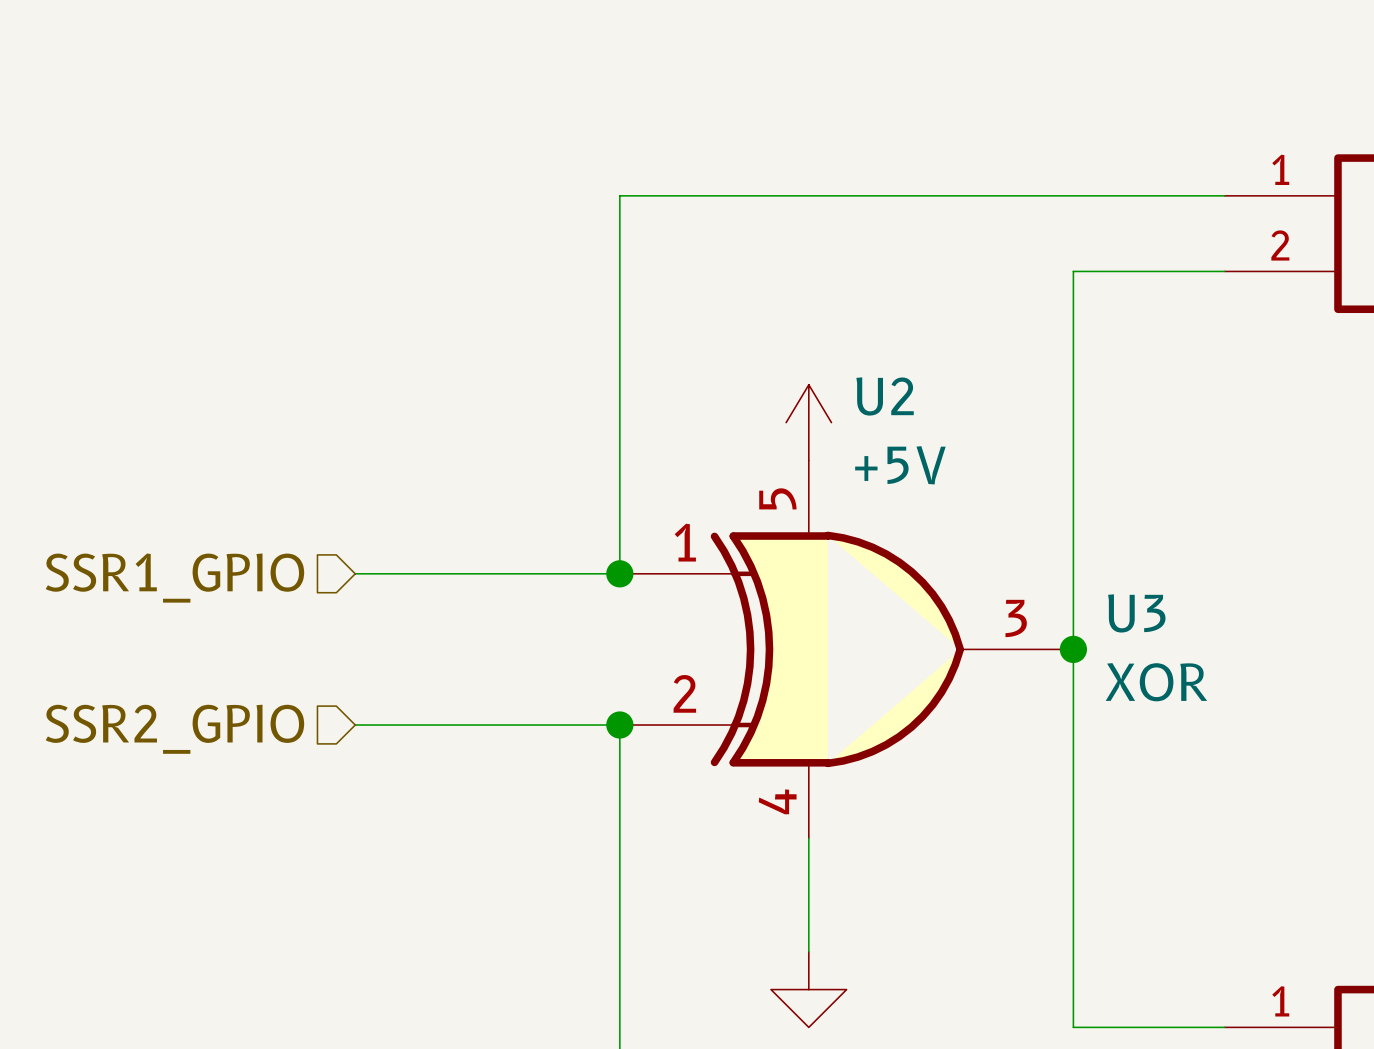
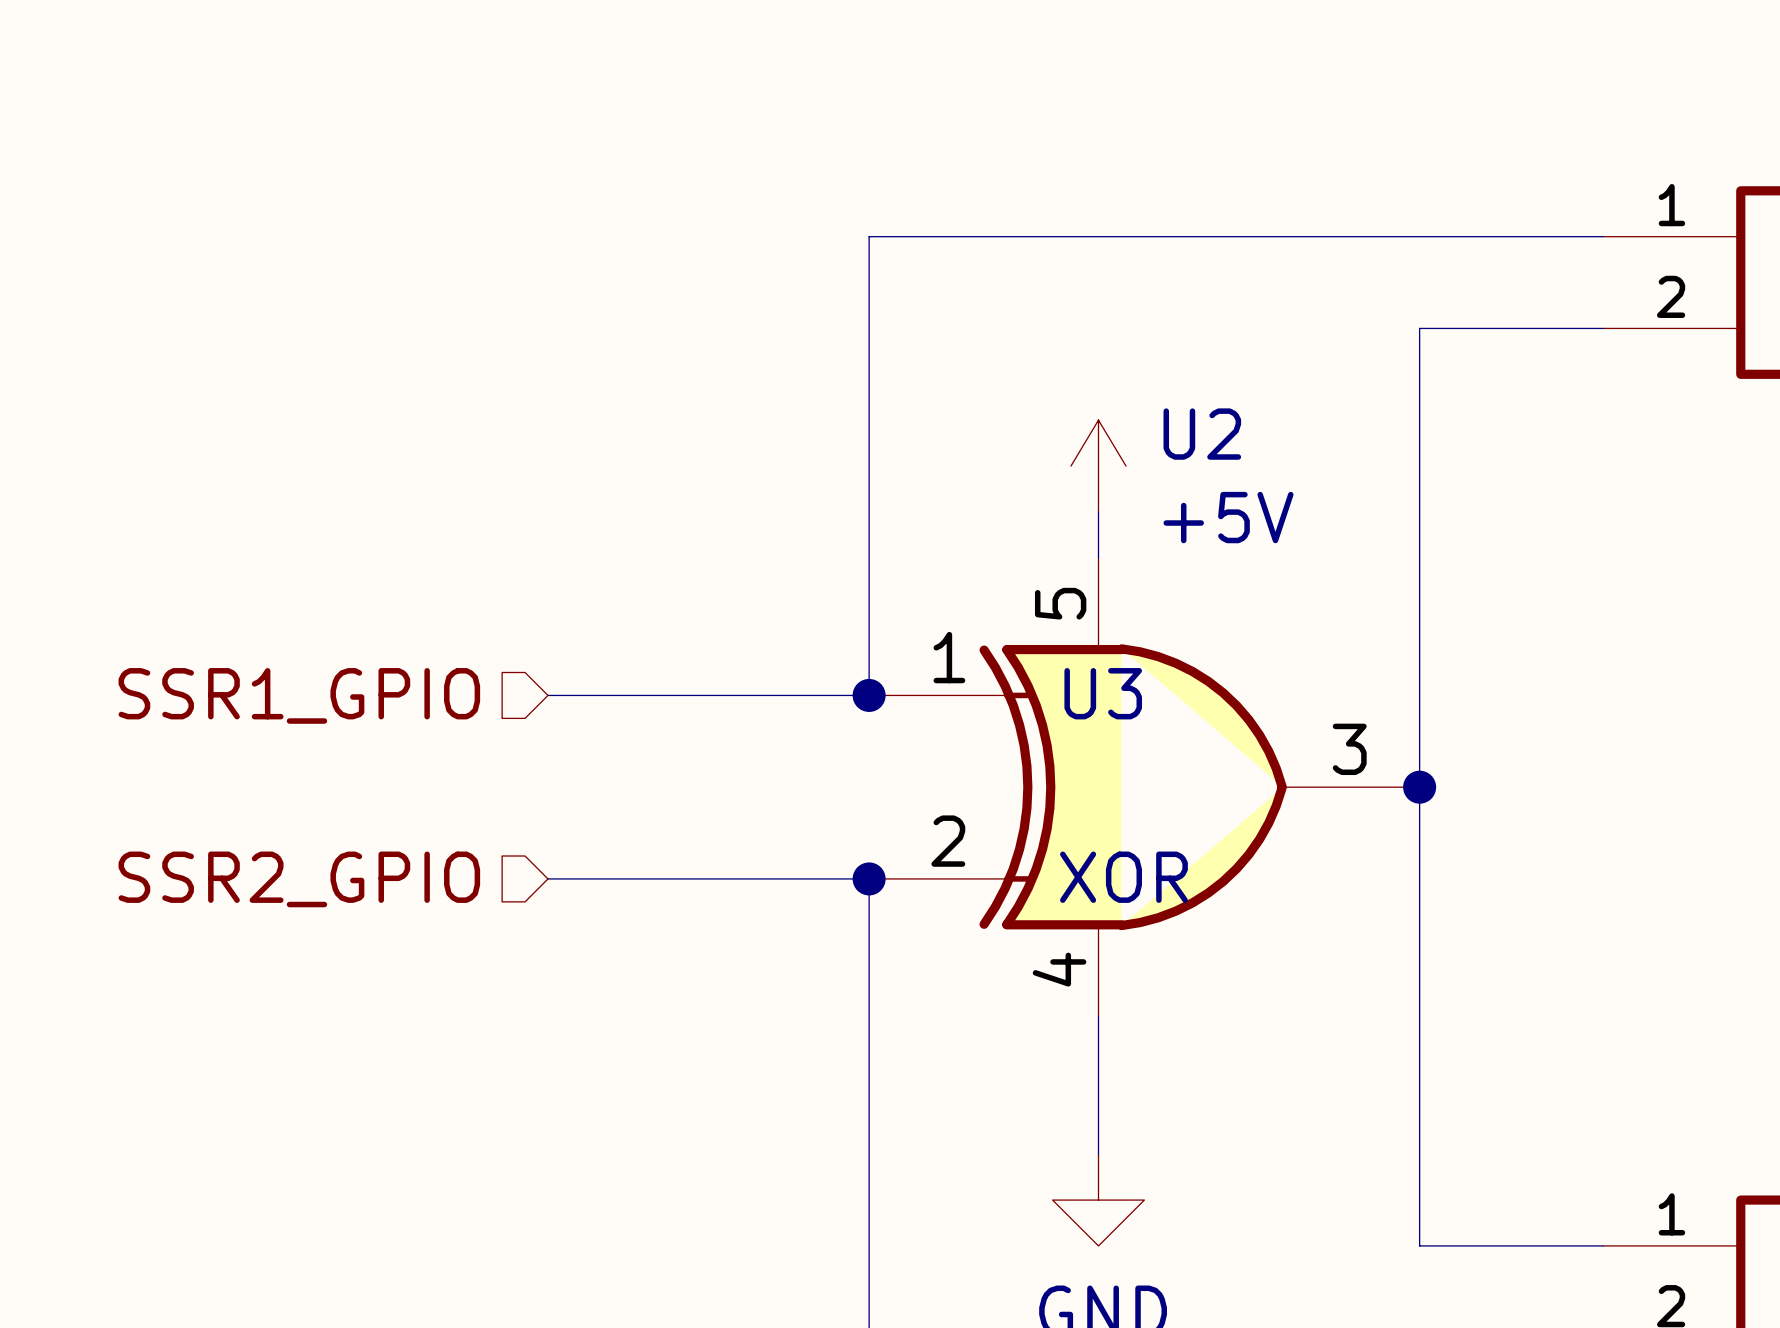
U2 position: (808, 422) -> (1098, 466)
U3 name position: U3 (1136, 613) -> U3 (1103, 693)
U3 value position: XOR (1156, 682) -> XOR (1123, 877)

